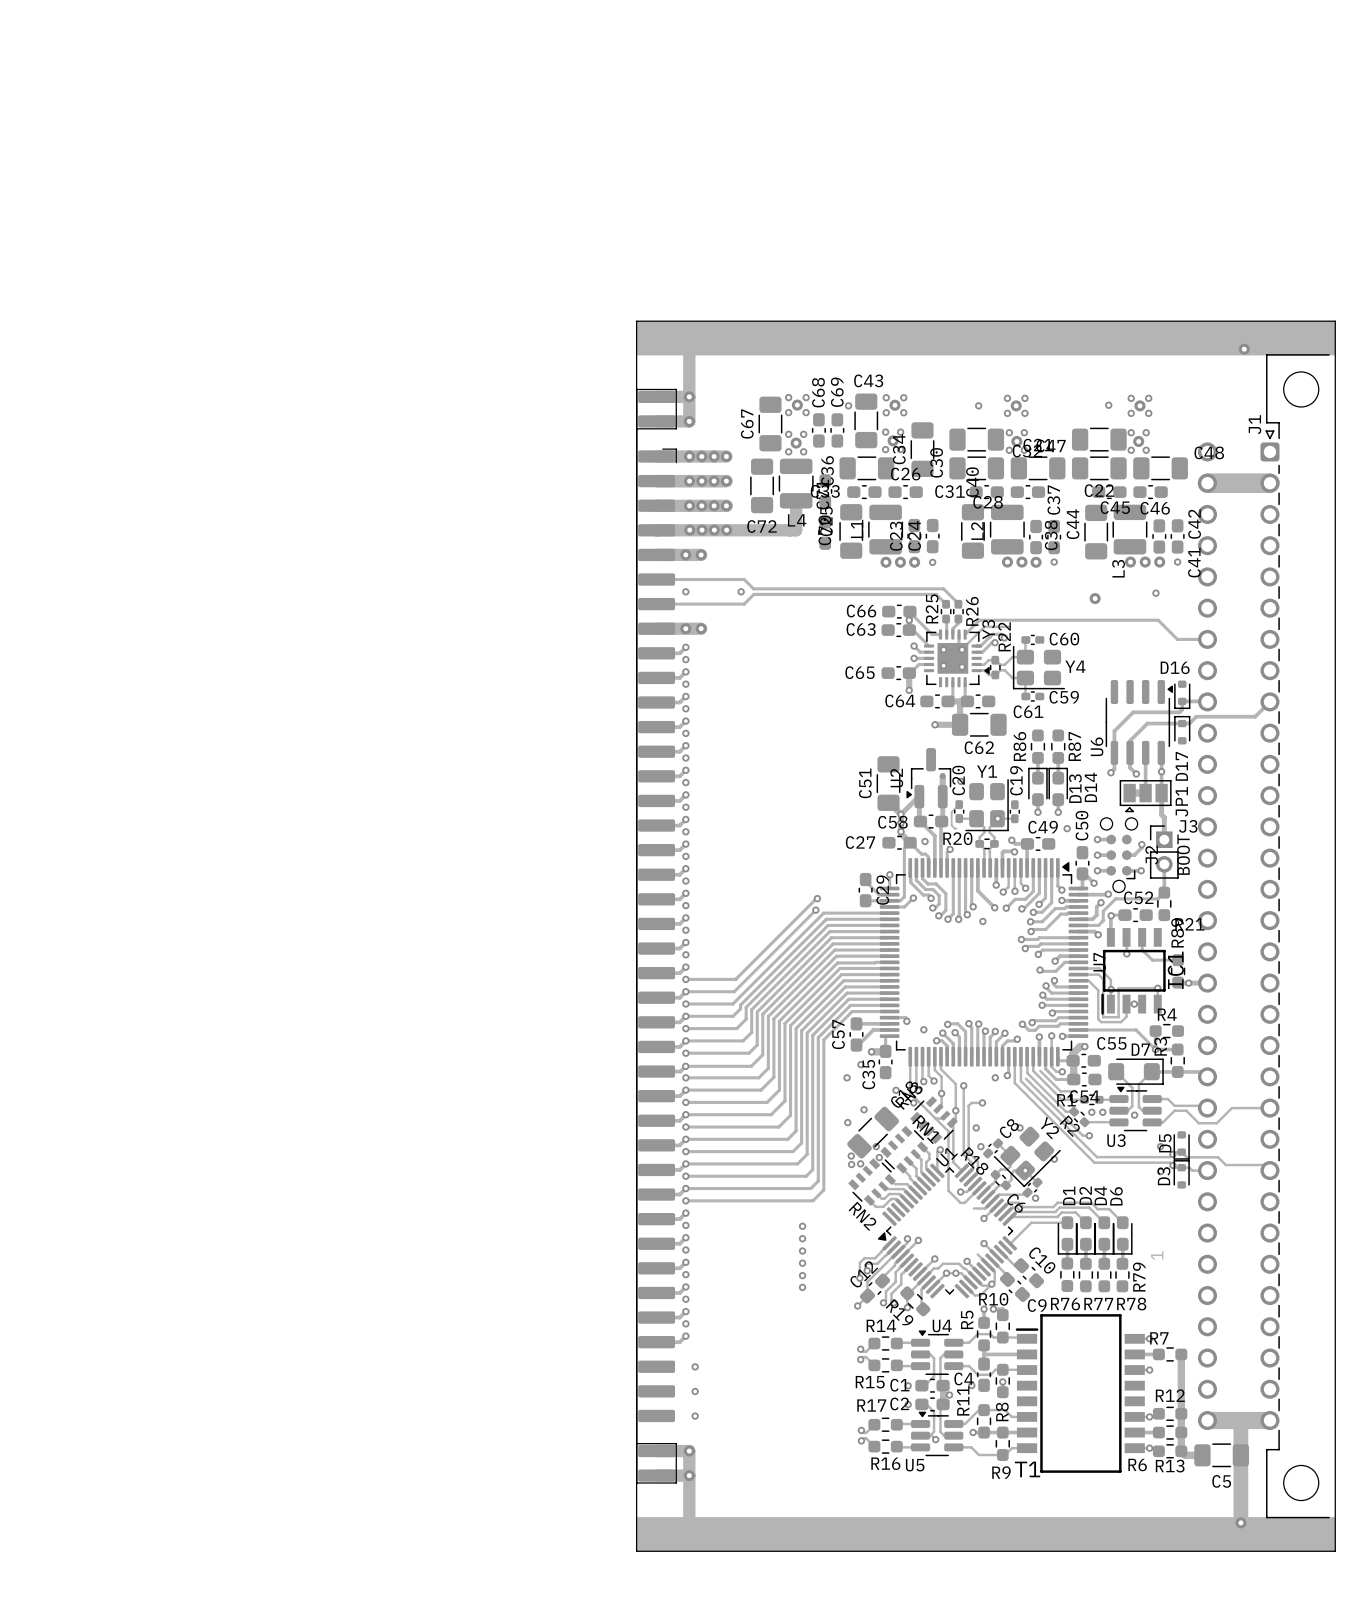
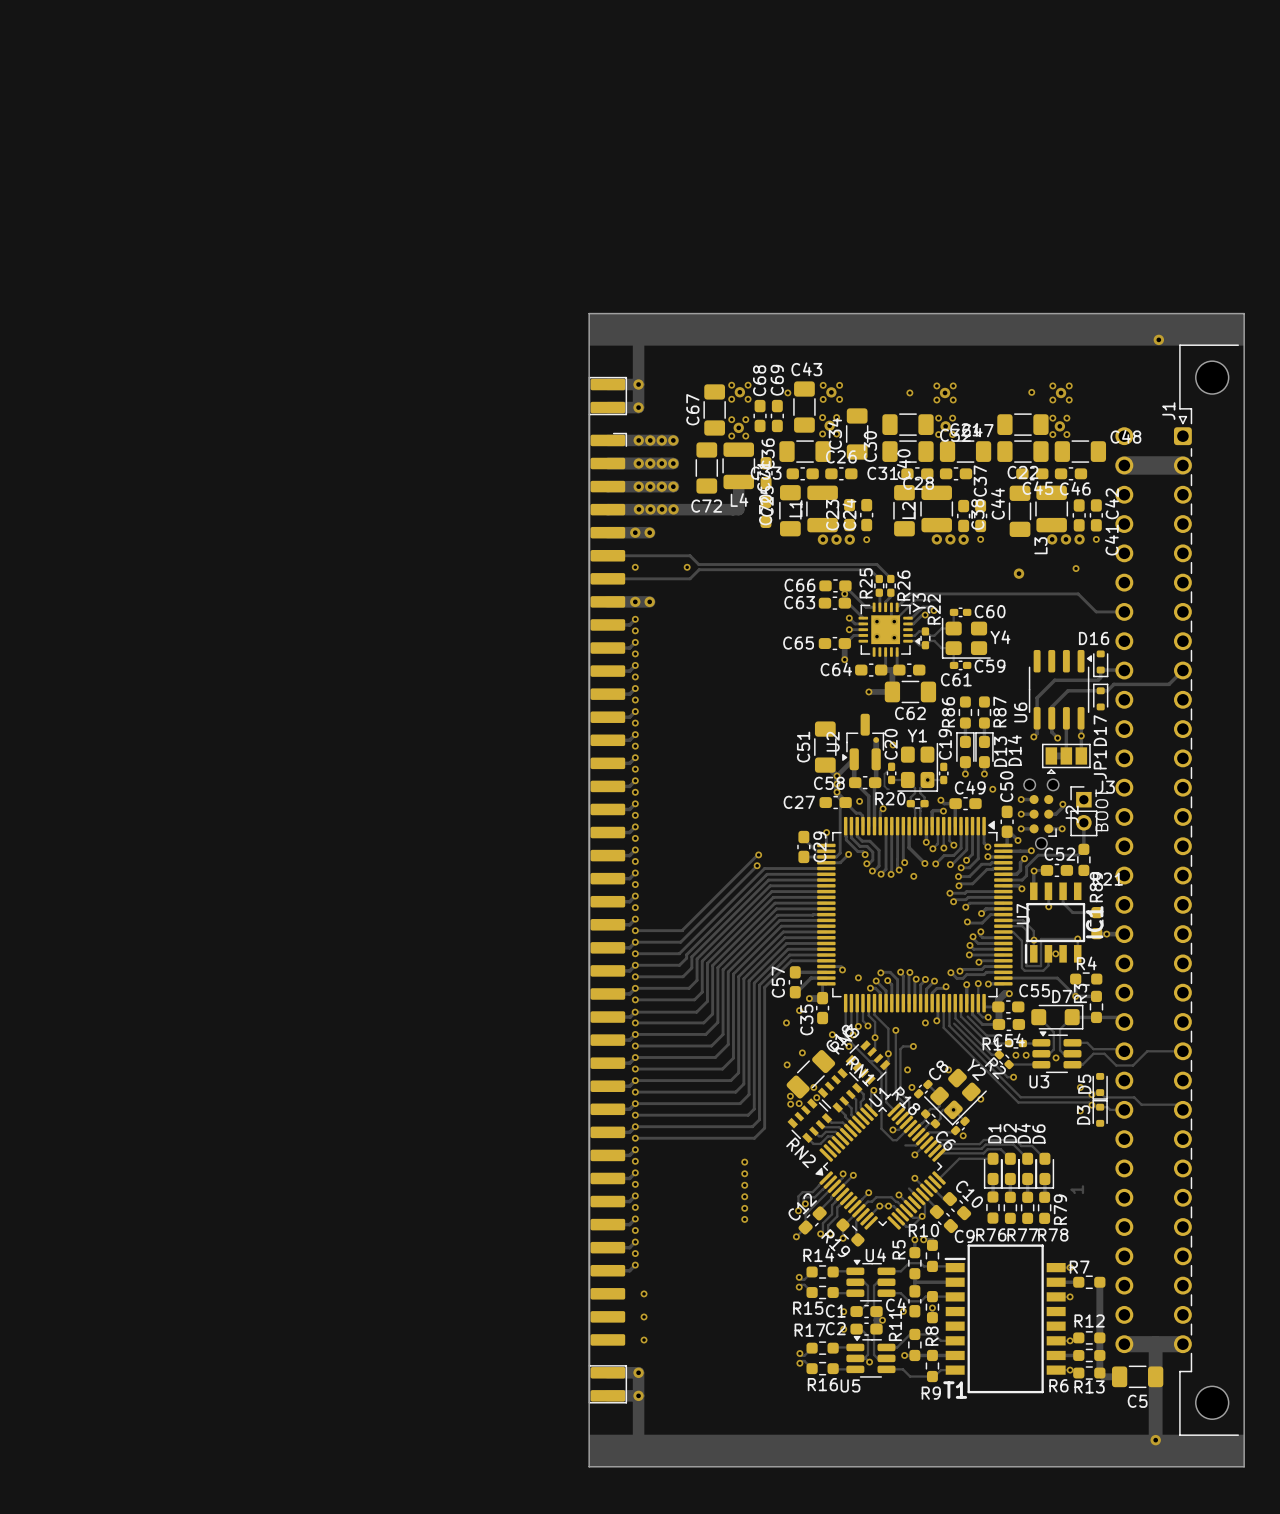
track: (1161, 793) (1164, 839) -> none

